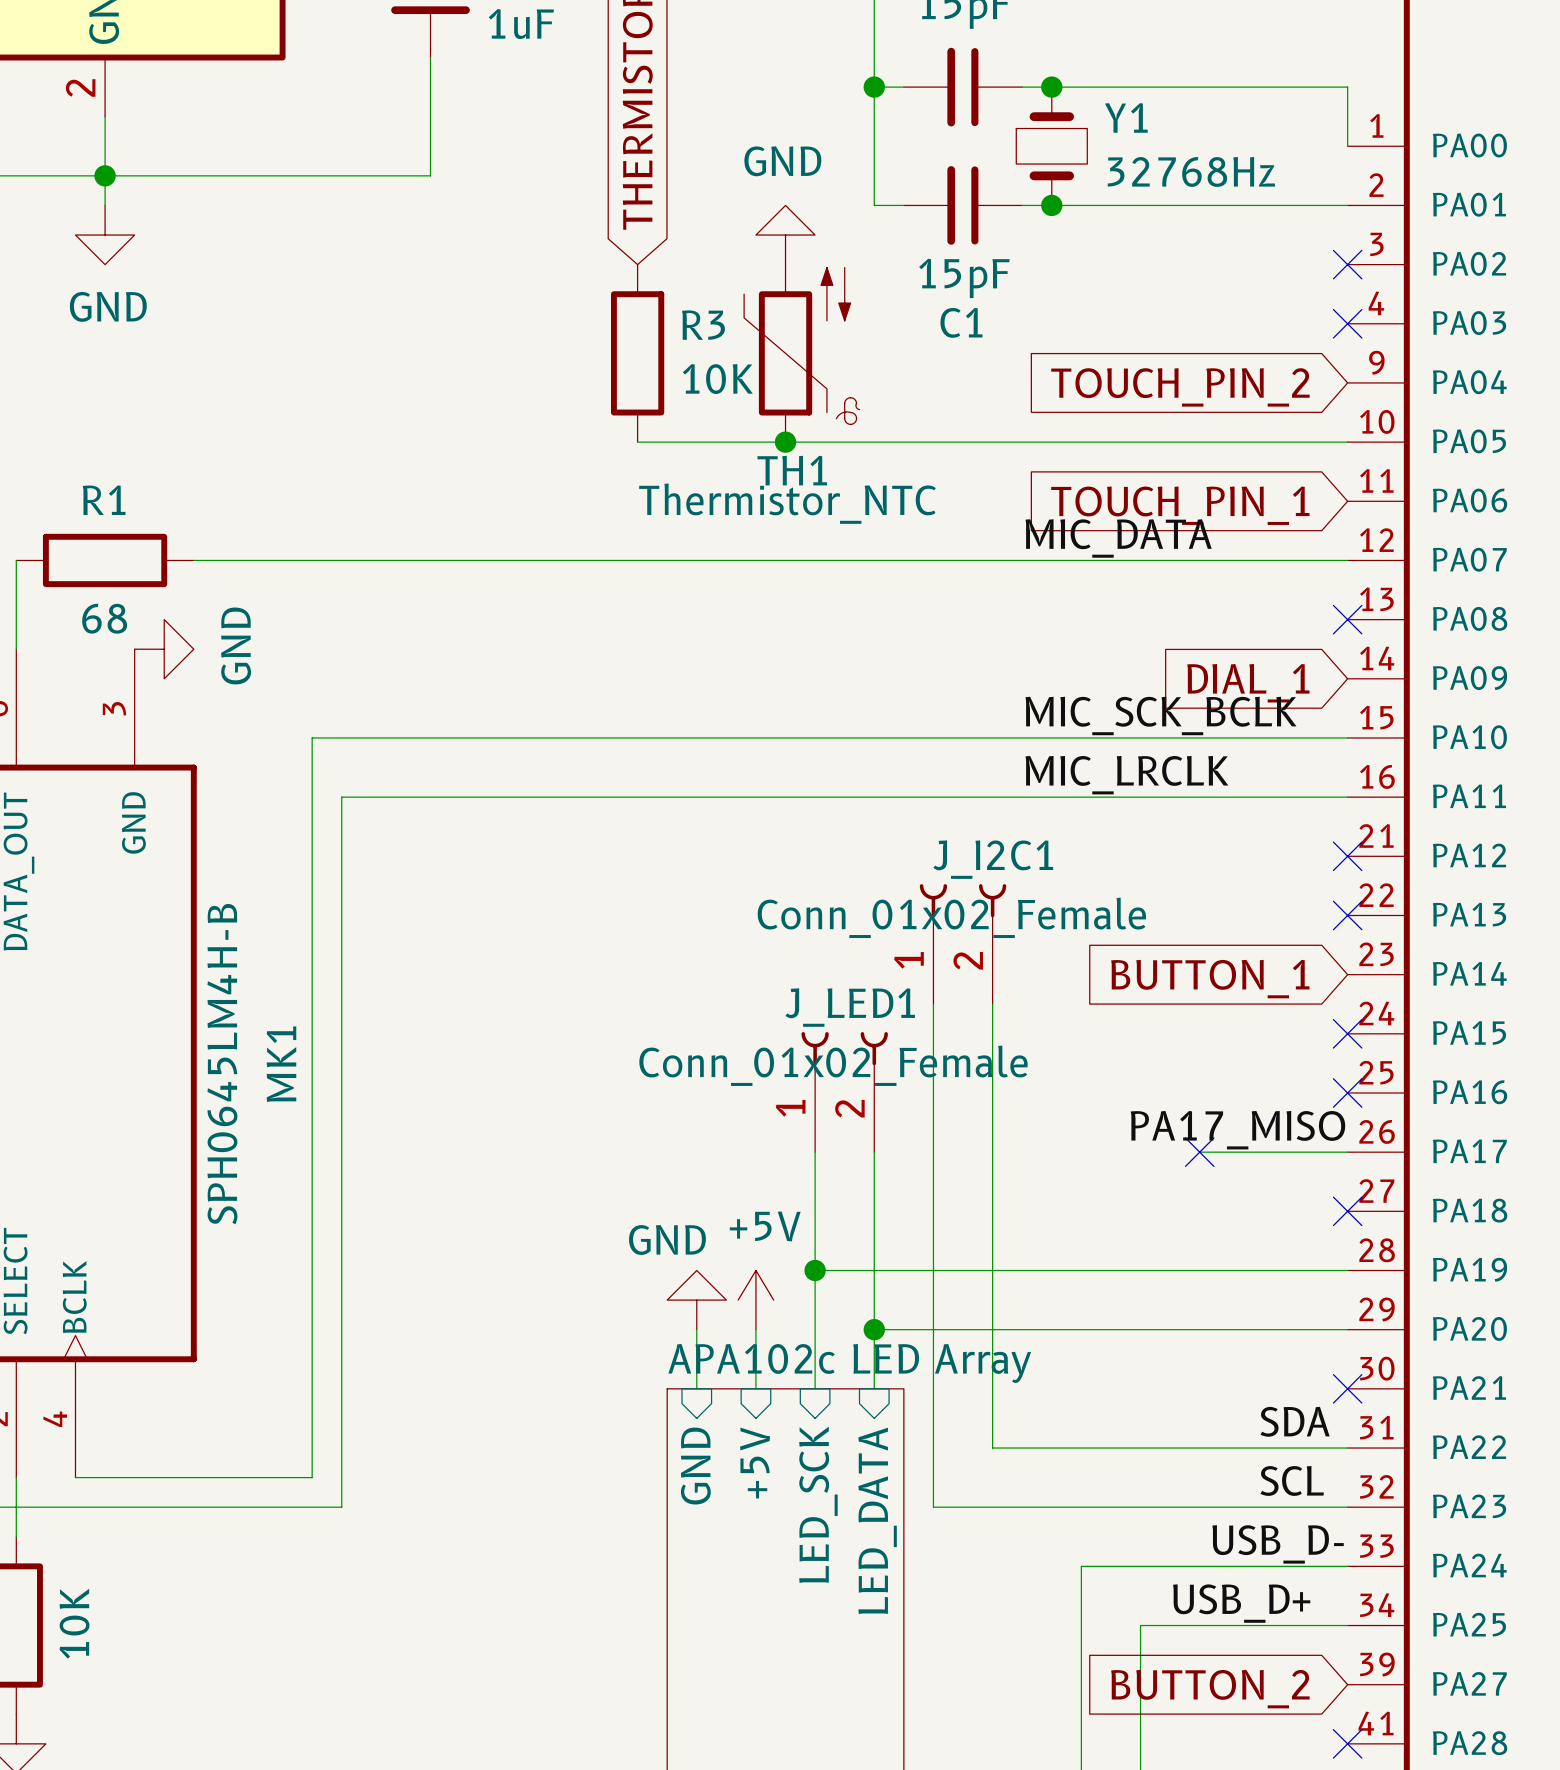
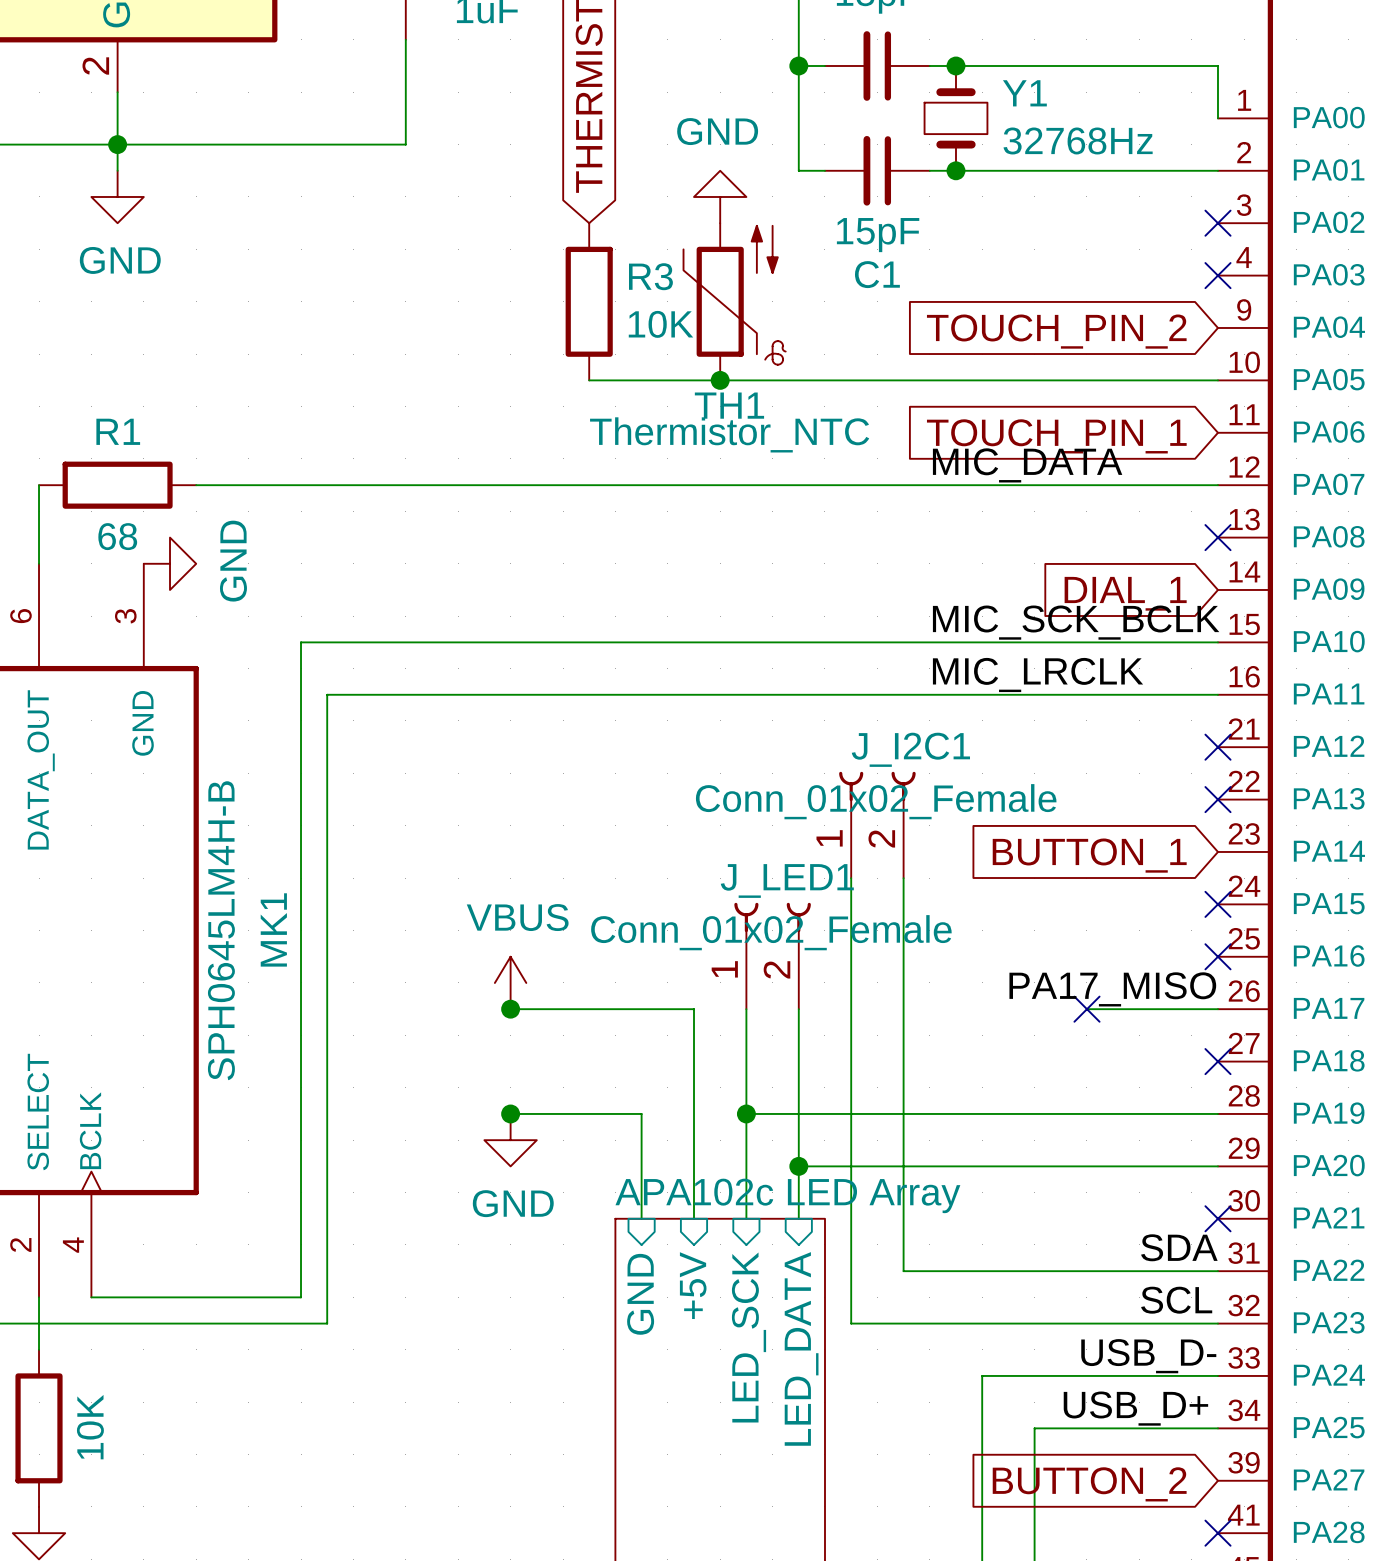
power symbol: none -> VBUS (510, 982)
wire: none -> (510, 1009) (694, 1009) (694, 1166)
junction: none -> (510, 1009)
wire: none -> (510, 1113) (641, 1113) (641, 1166)
junction: none -> (510, 1113)
power symbol rotation: 0° (696, 1300) -> 180° (510, 1140)
power symbol position: GND (696, 1300) -> GND (510, 1140)
power symbol: +5V (755, 1300) -> none

